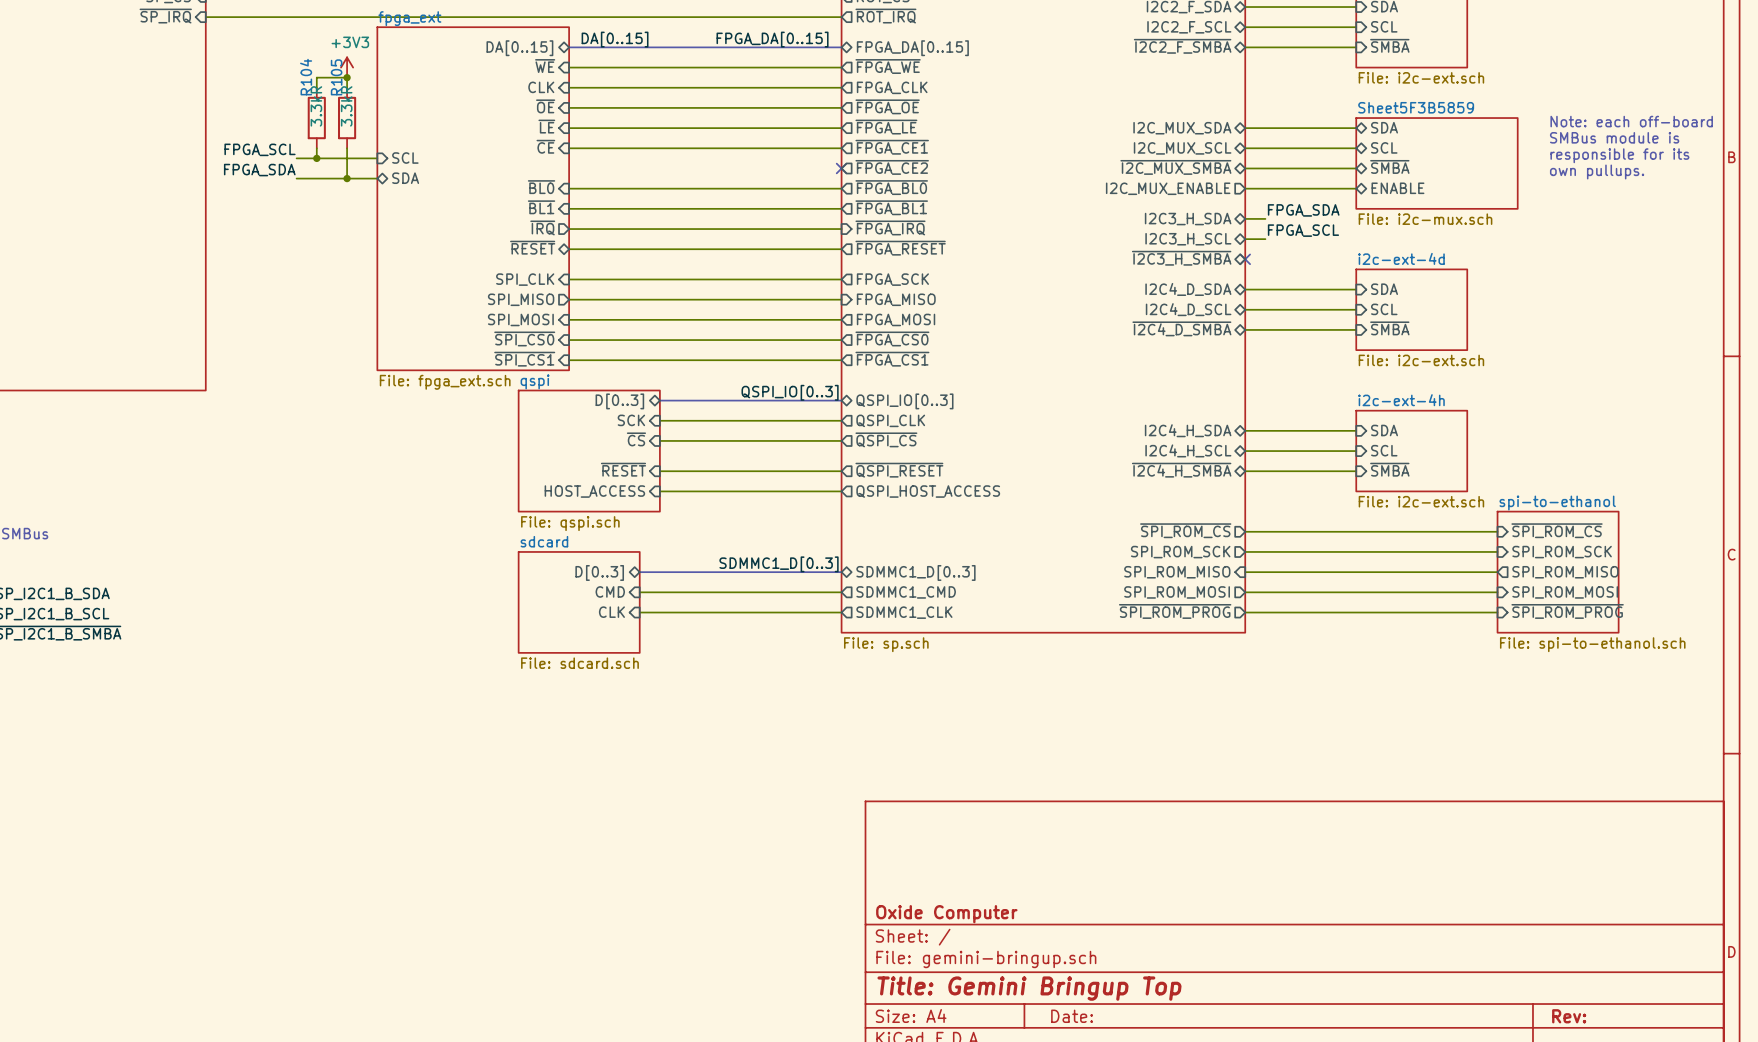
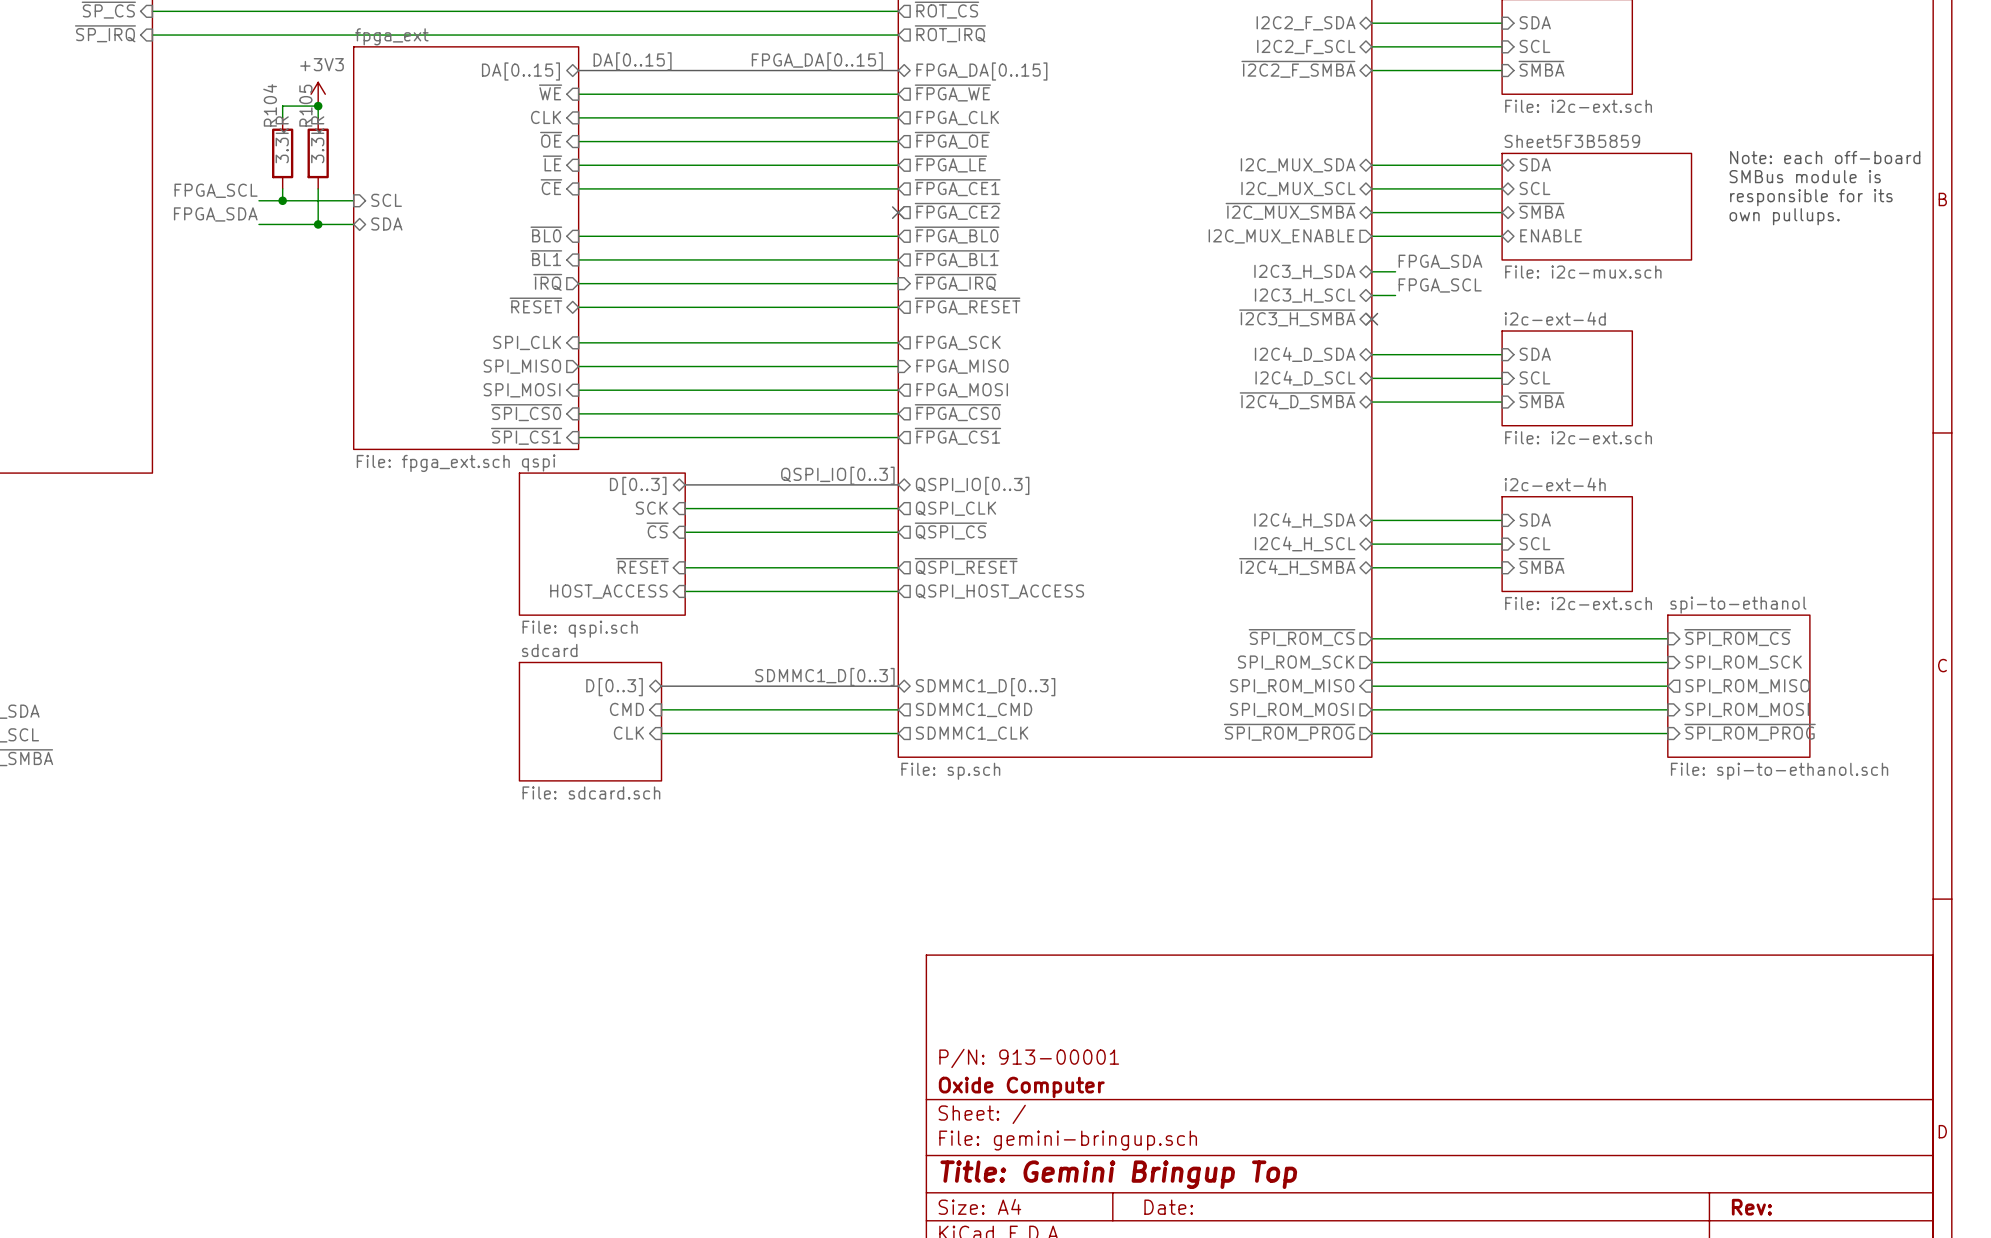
title block: none -> P/N: 913-00001 (1029, 1058)

